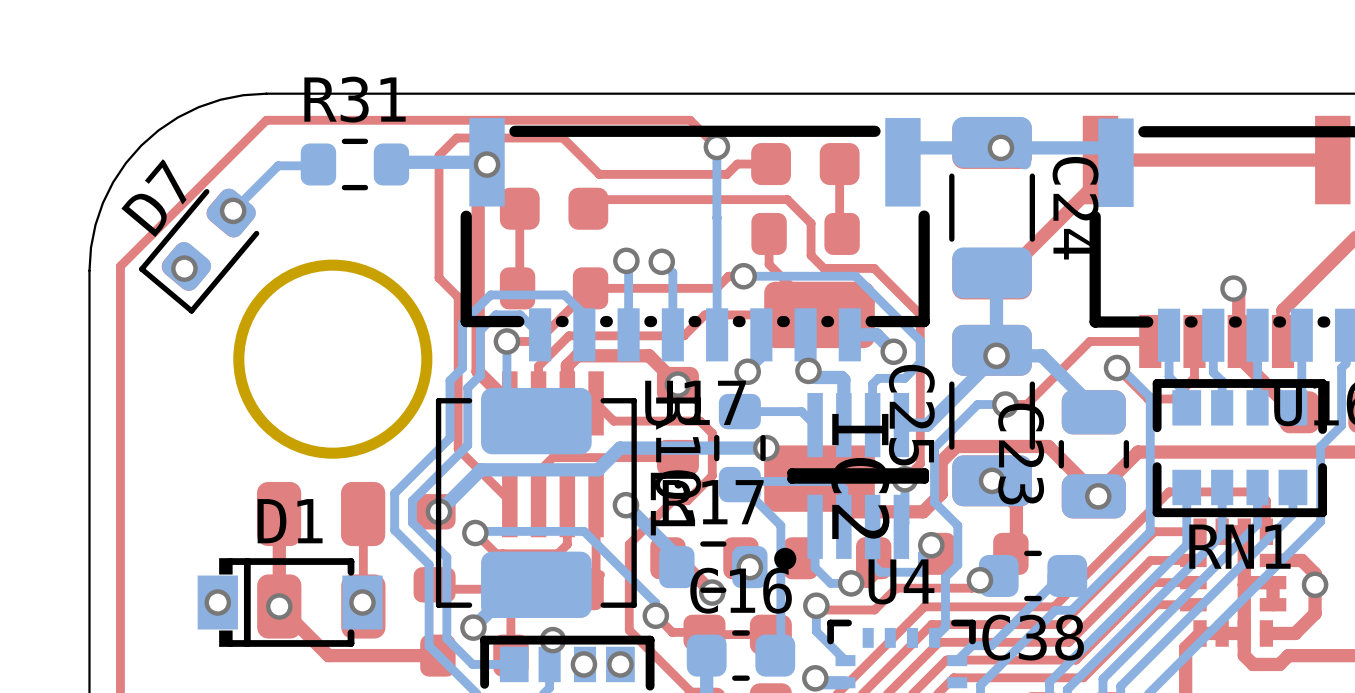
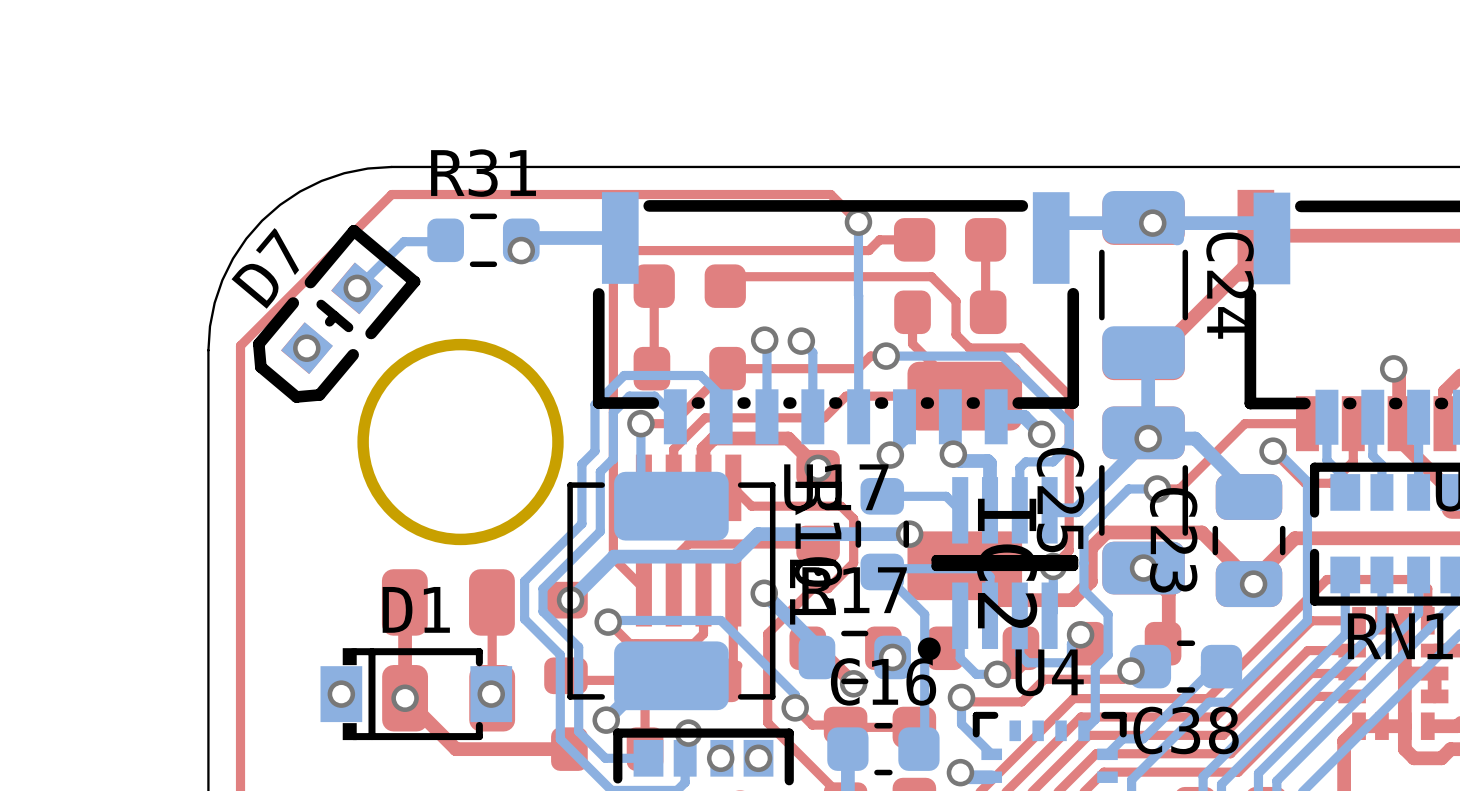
top track: (487, 164) (478, 173) (478, 371) (509, 403) -> none
via position: (487, 164) -> (521, 250)
top track: (599, 174) (562, 138) (456, 138) (439, 155) (439, 278) (458, 297) (458, 449) (480, 471) -> (736, 250) (633, 250) (613, 270) (613, 558)
D7 footprint: [139, 188, 260, 314] -> [253, 224, 421, 403]

